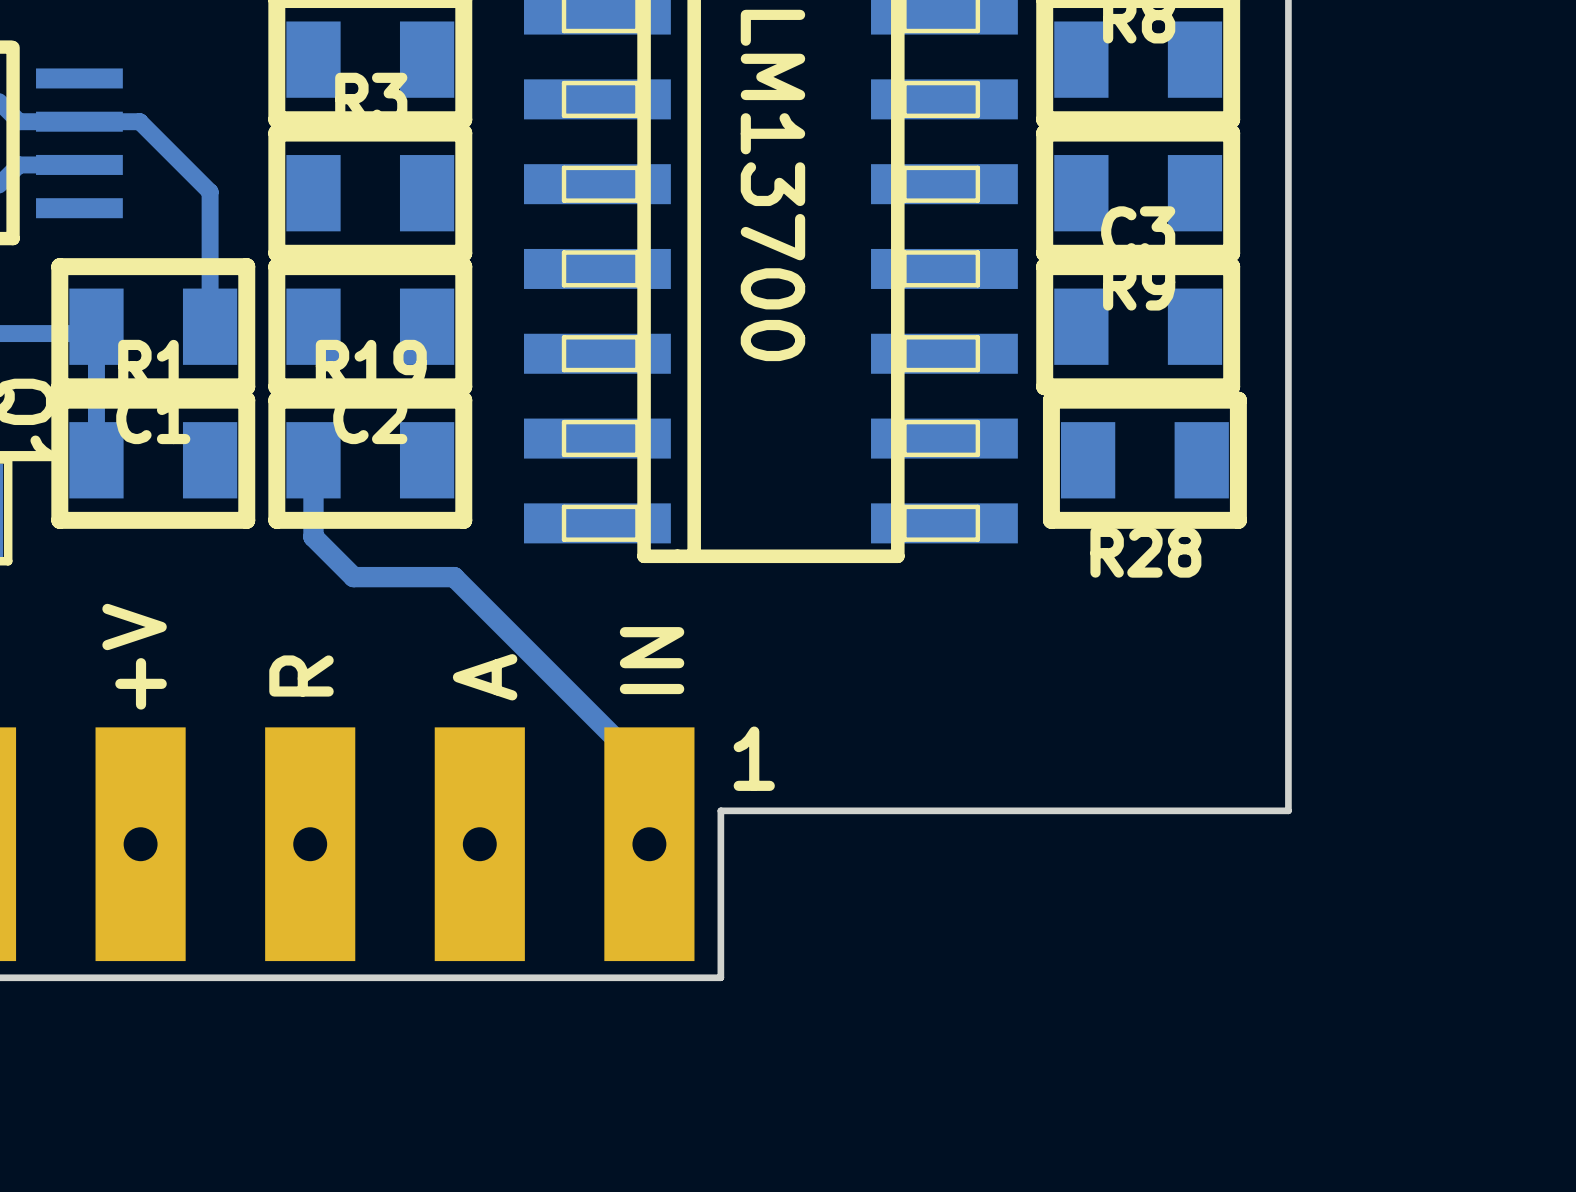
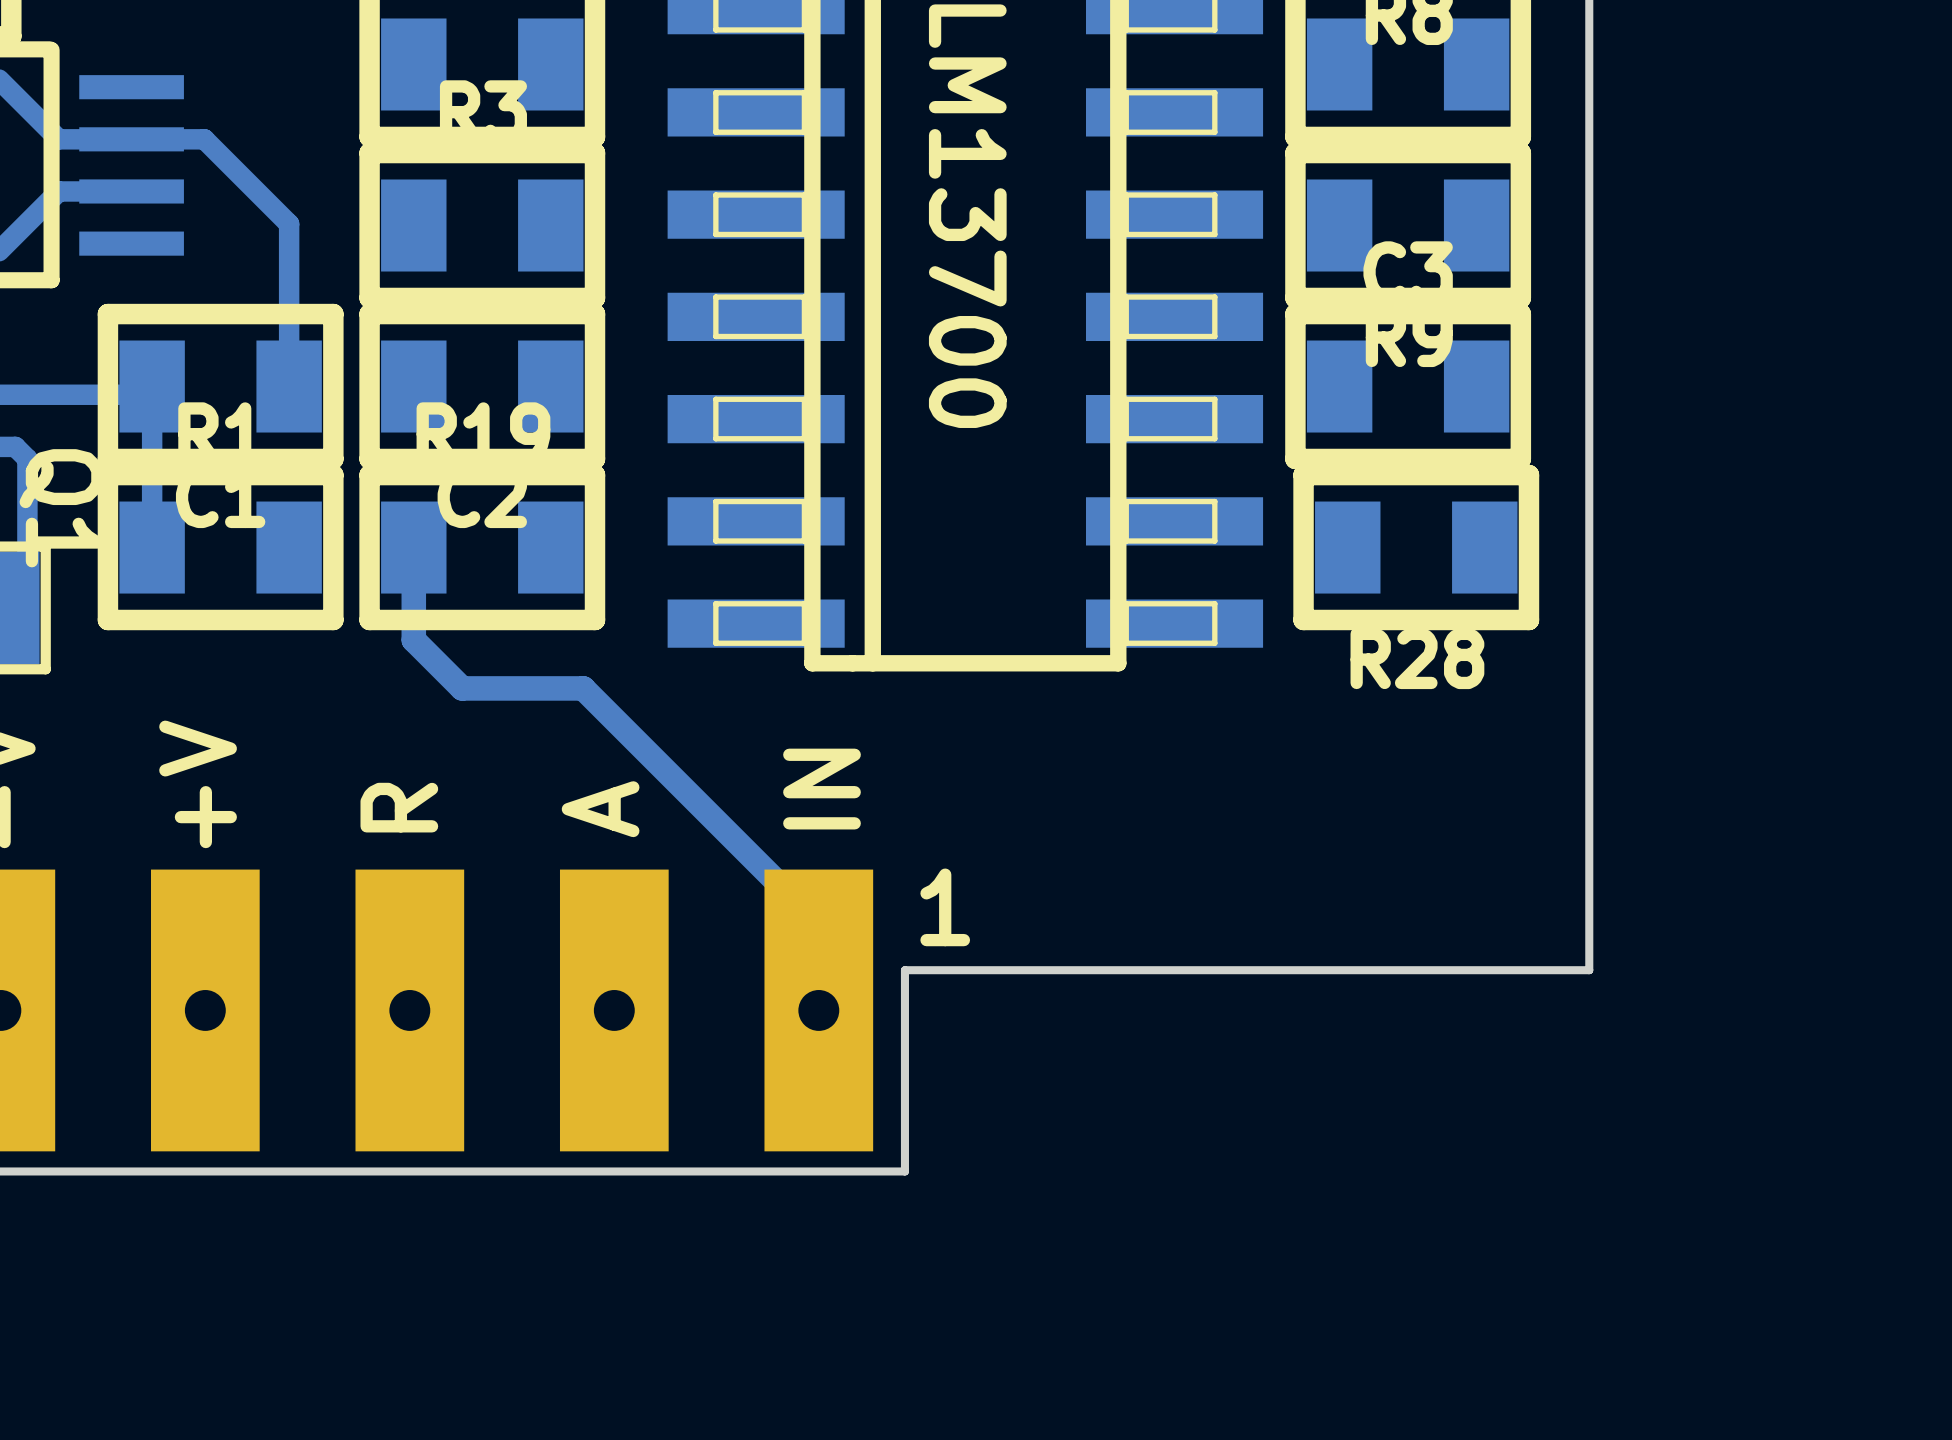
text position: A (485, 677) -> A (600, 809)

